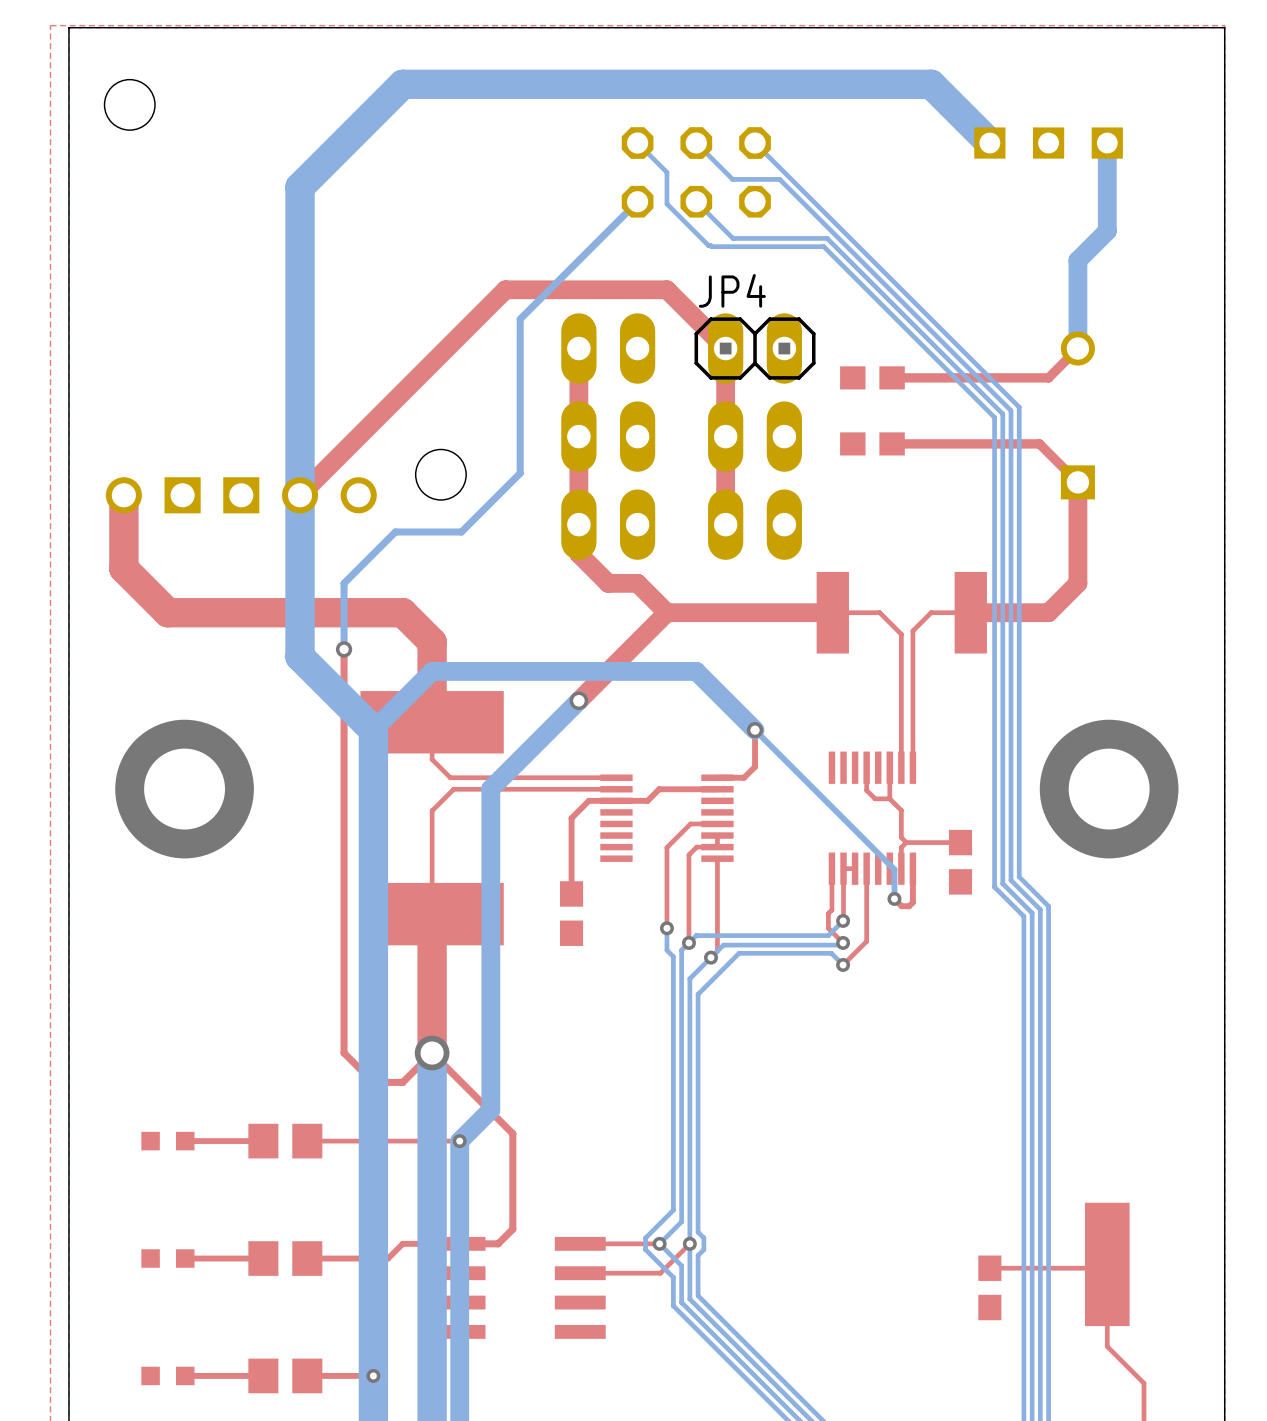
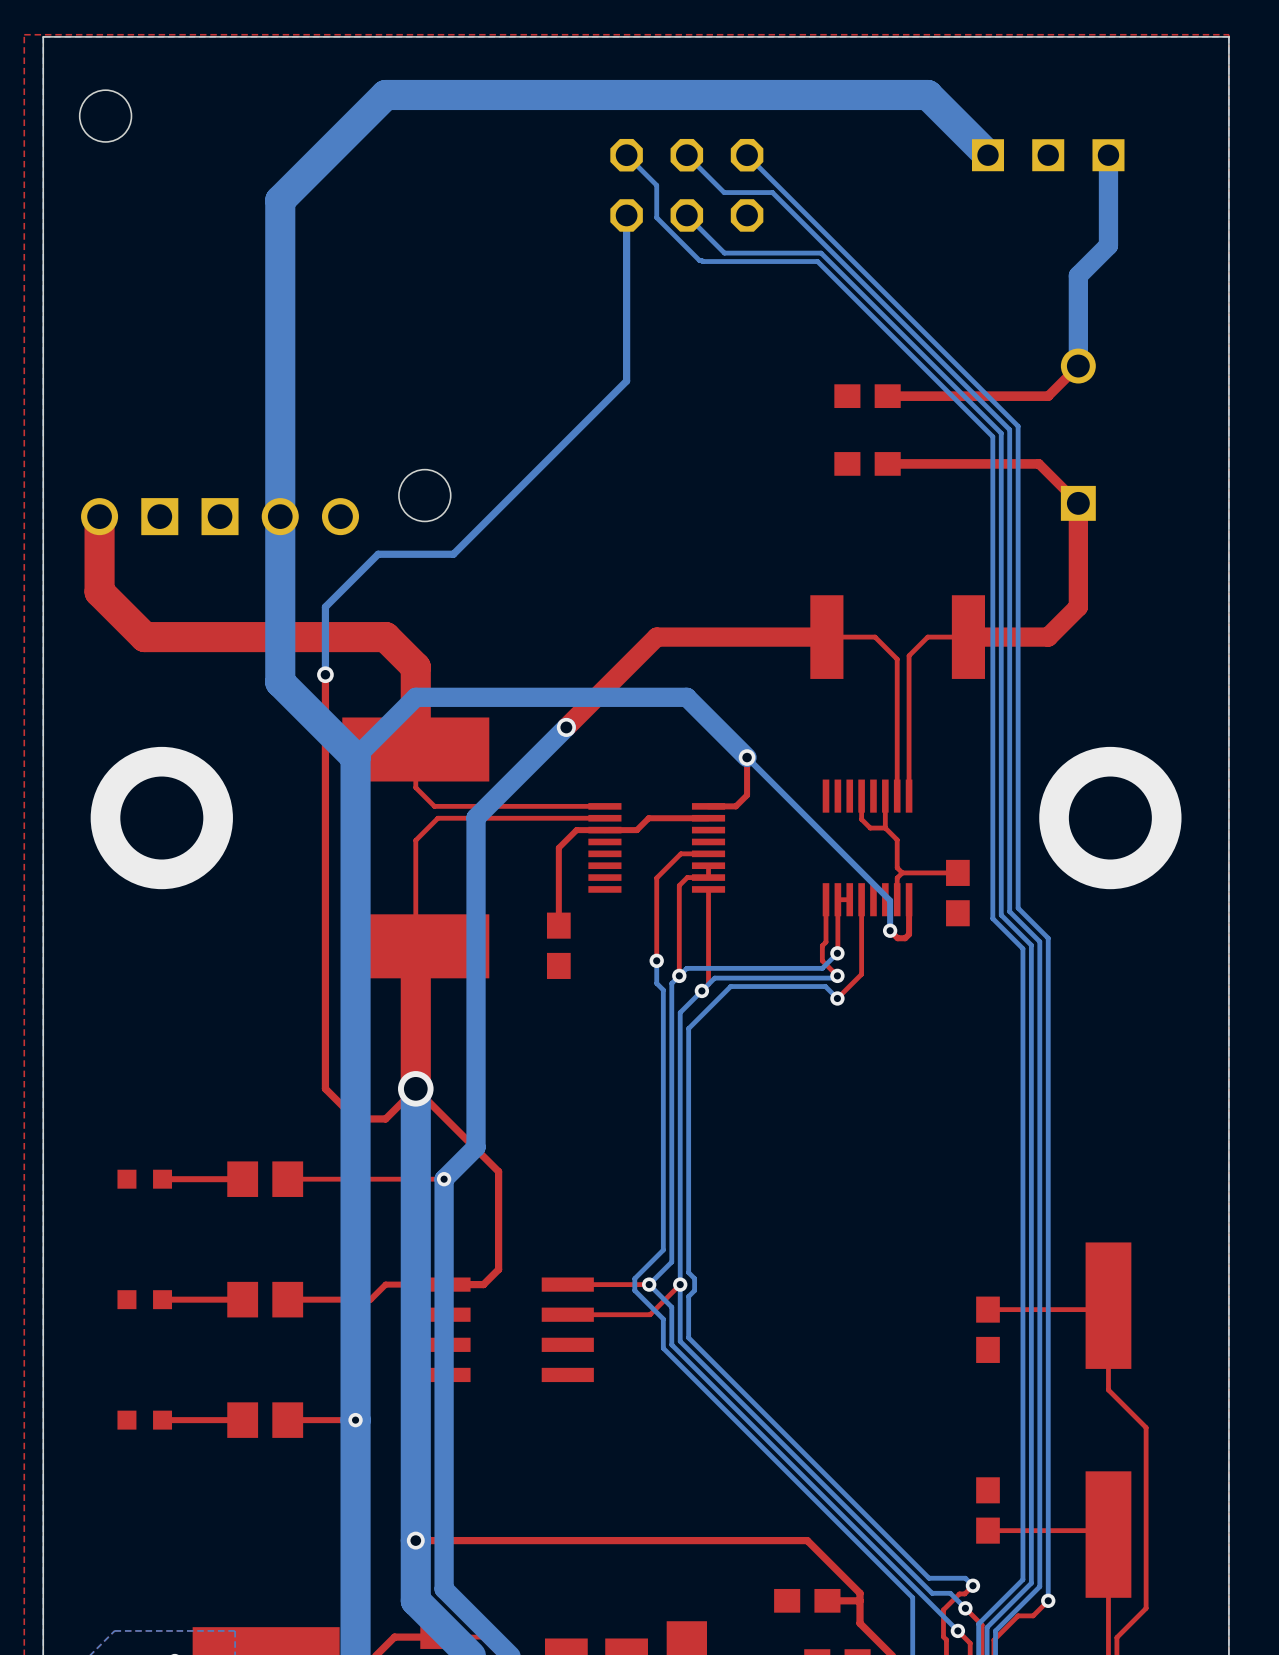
bottom track: (637, 201) (520, 319) (520, 473) (461, 531) -> (626, 215) (626, 381) (453, 554) (445, 554)
top track: (578, 348) (578, 554) (608, 583) (637, 583) (666, 612) -> none
part: (608, 348) -> none
JP4: (755, 348) -> none
part: (608, 436) -> none
part: (755, 436) -> none
top track: (300, 495) (505, 289) (666, 289) (725, 348) (725, 524) -> none
part: (608, 524) -> none
part: (755, 524) -> none

